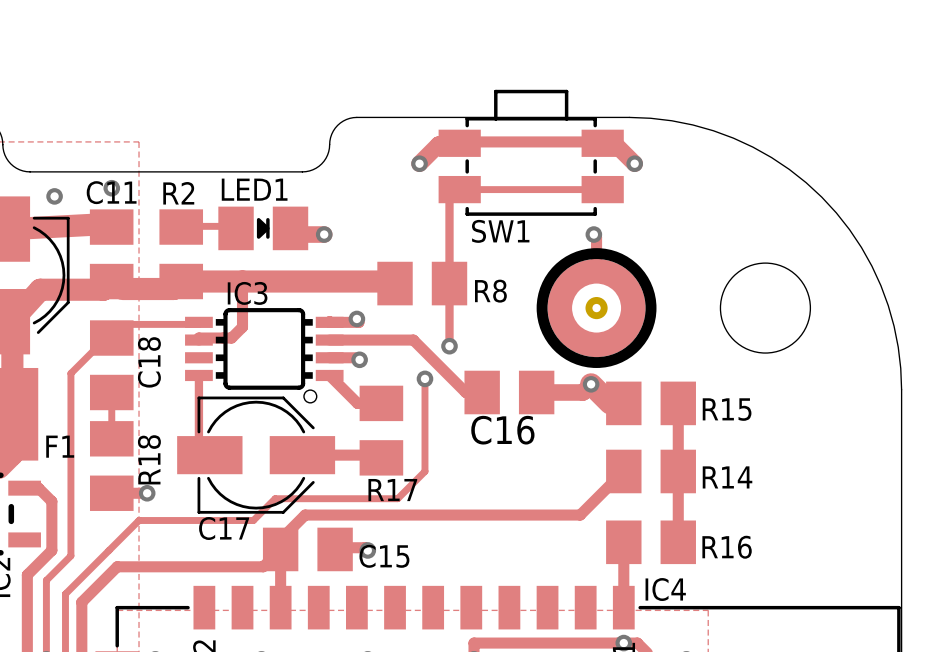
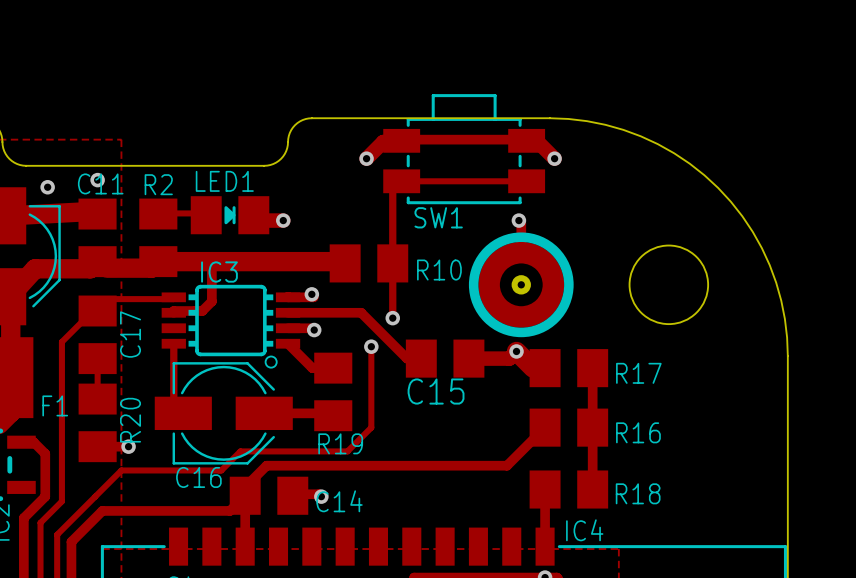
R8 name: R8 (490, 291) -> R10 (439, 270)
C18 name: C18 (149, 362) -> C17 (130, 334)
R15 name: R15 (727, 409) -> R17 (638, 373)
C16 name: C16 (502, 430) -> C15 (436, 391)
R18 name: R18 (149, 459) -> R20 (130, 420)
R14 name: R14 (727, 477) -> R16 (638, 432)
R17 name: R17 (392, 490) -> R19 (340, 443)
C17 name: C17 (224, 528) -> C16 (198, 477)
R16 name: R16 (727, 547) -> R18 (638, 493)
C15 name: C15 (384, 556) -> C14 (339, 501)

